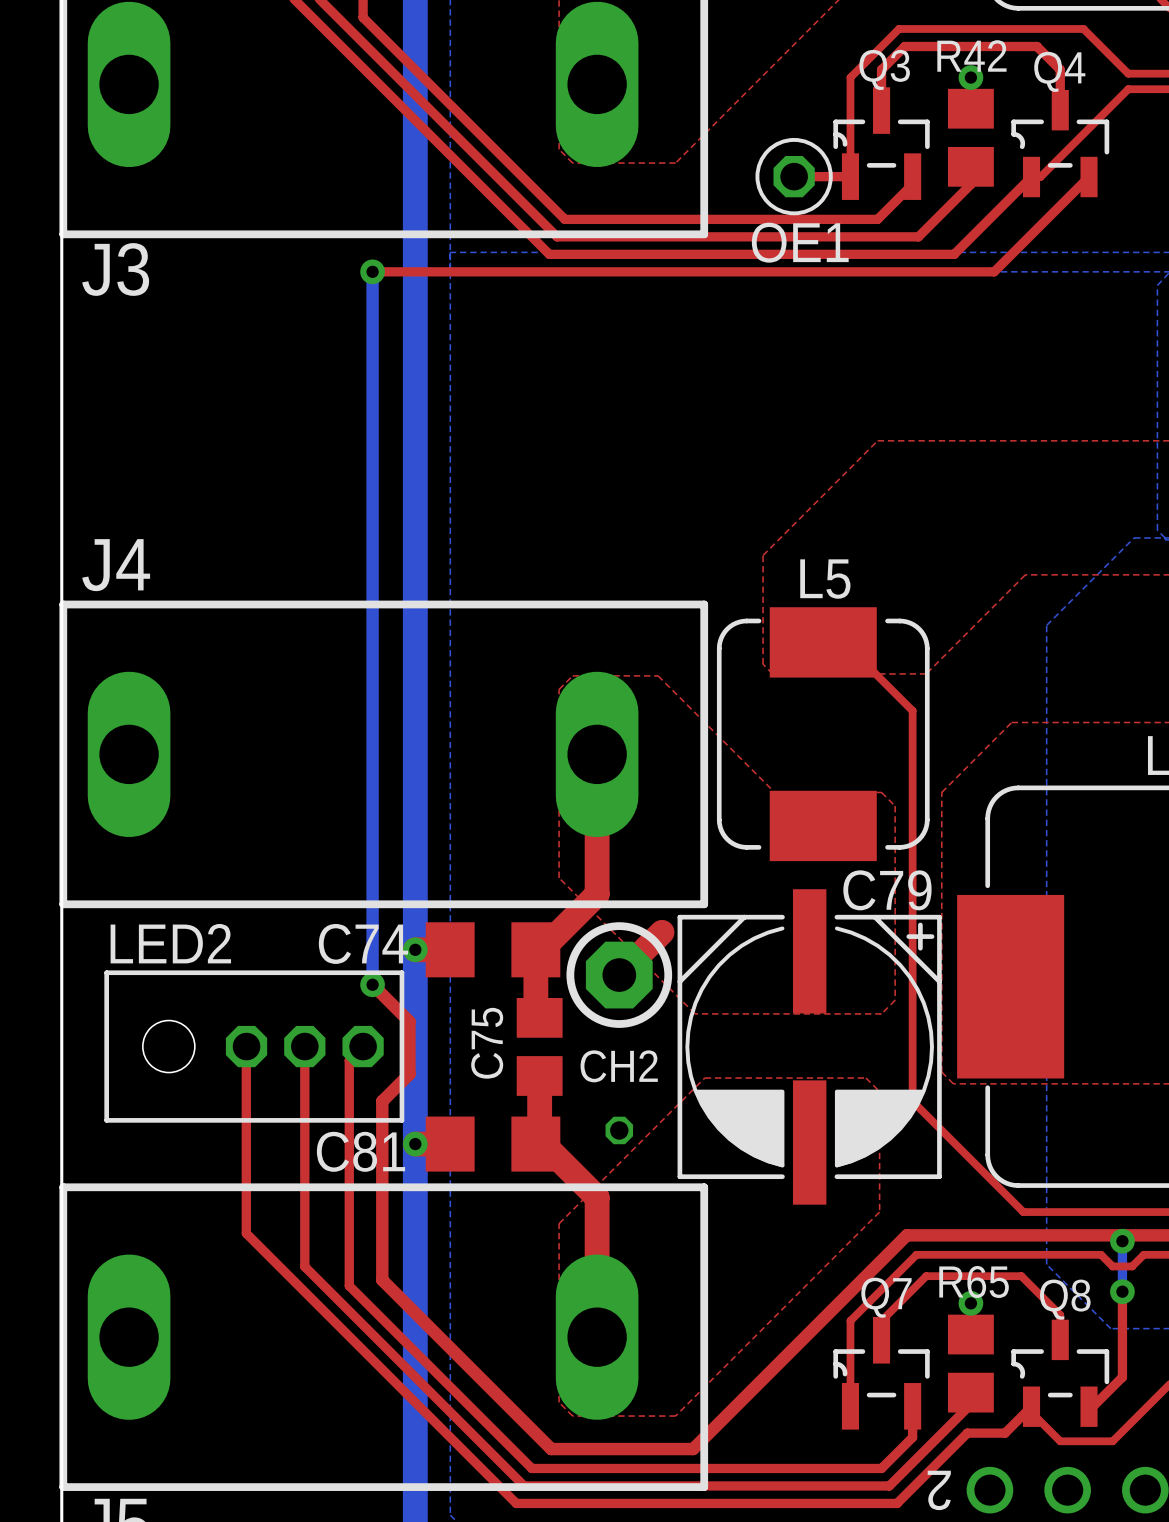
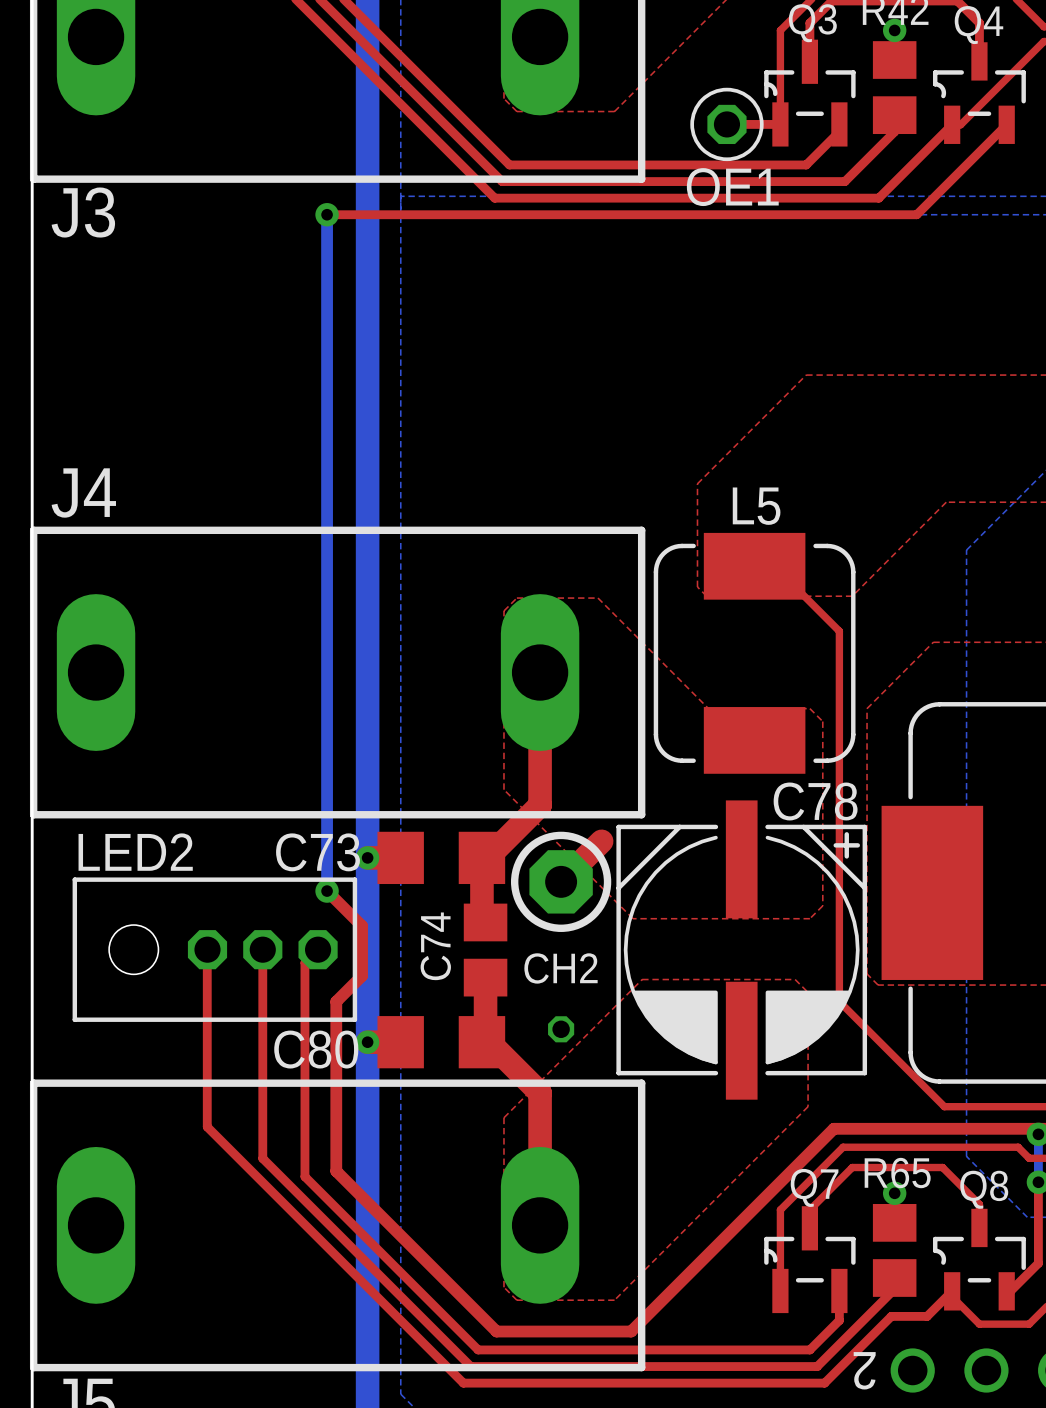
C79 name: C79 (887, 890) -> C78 (815, 801)
C74 name: C74 (363, 943) -> C73 (318, 852)
C75 name: C75 (487, 1043) -> C74 (435, 946)
C81 name: C81 (360, 1151) -> C80 (316, 1049)

